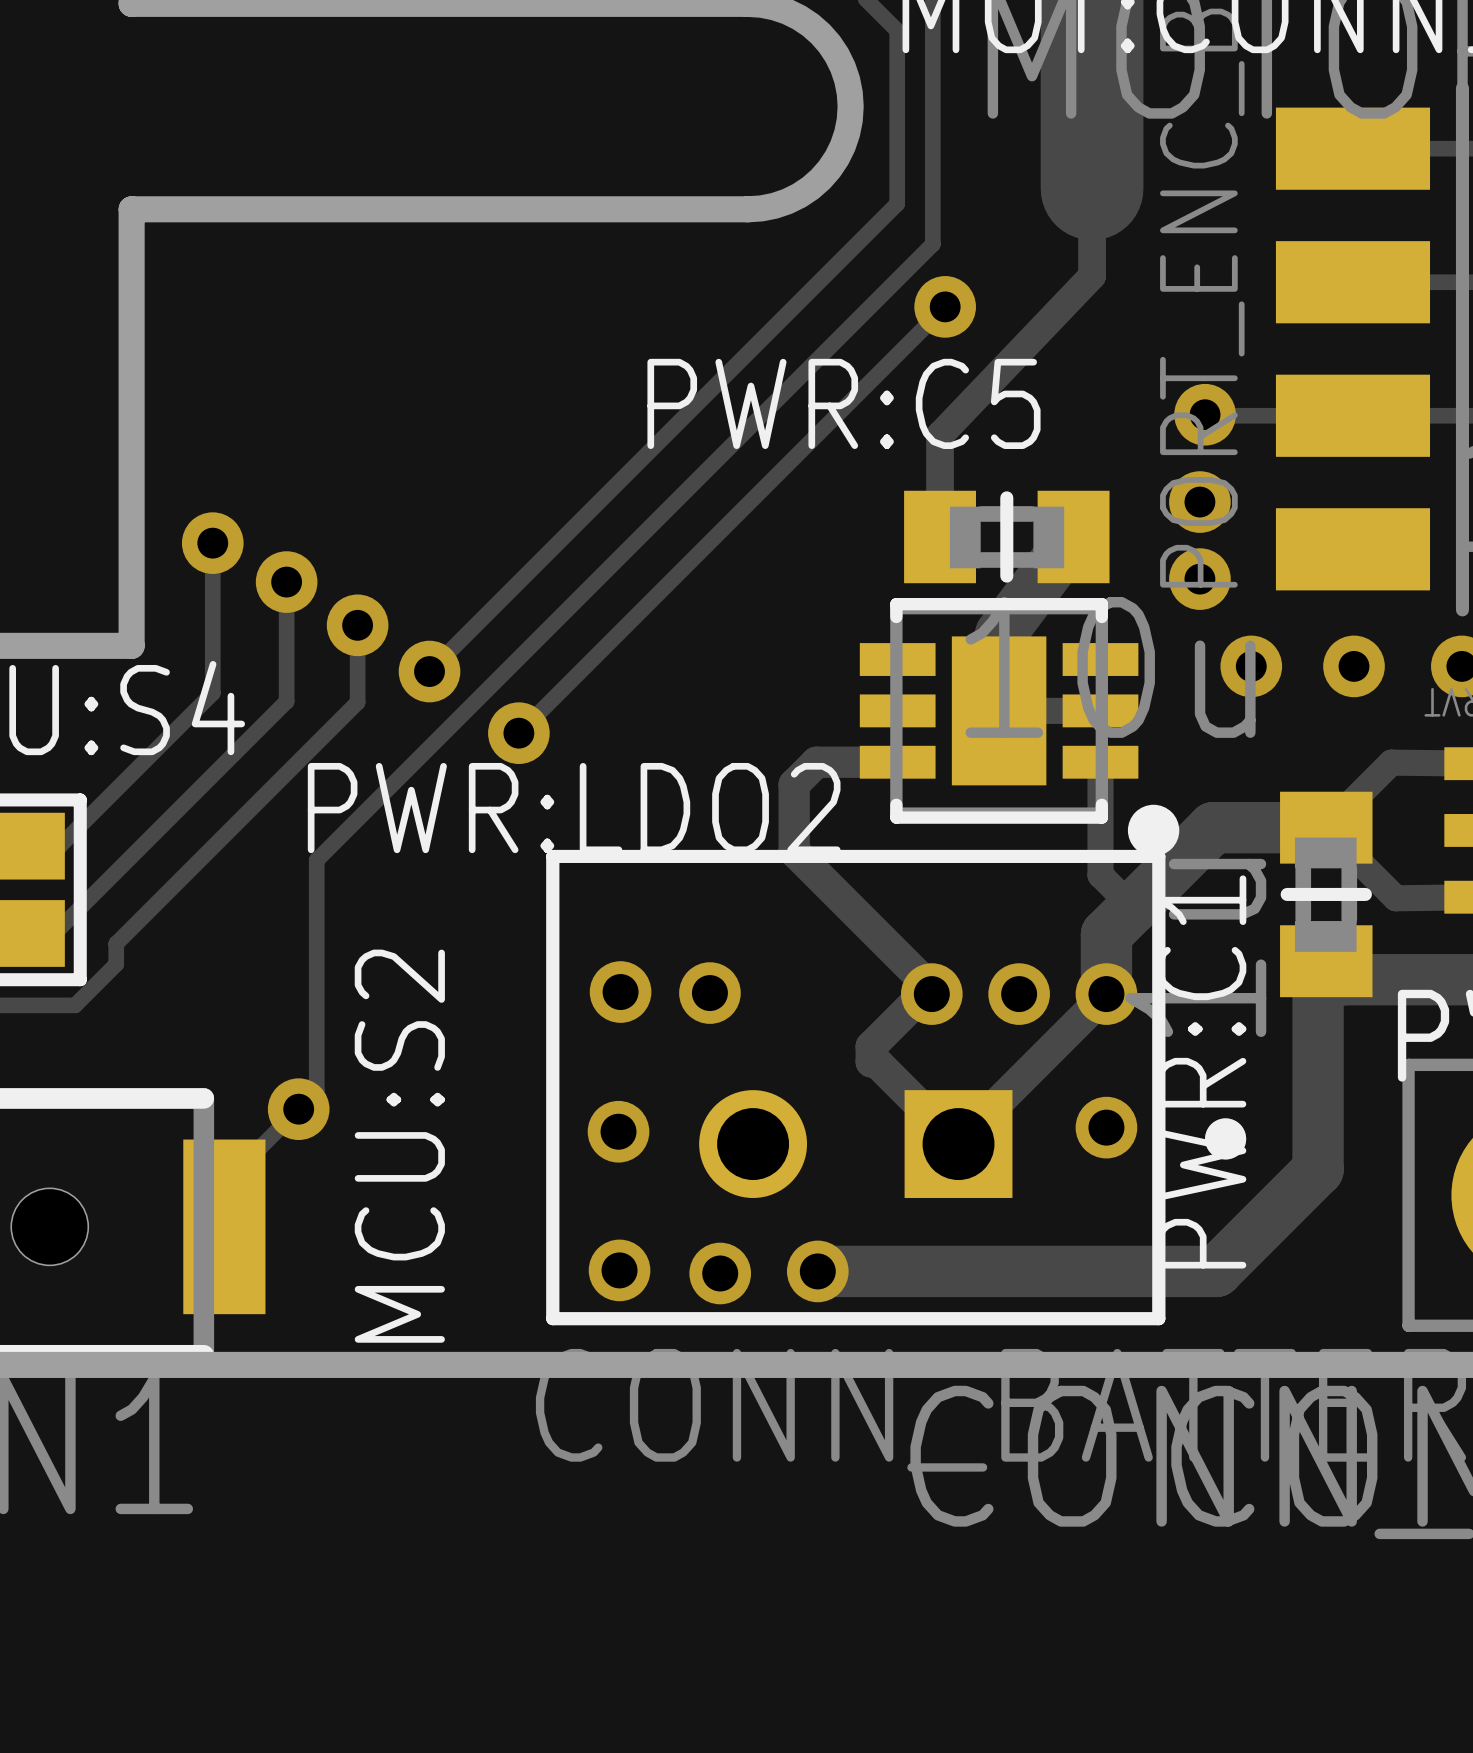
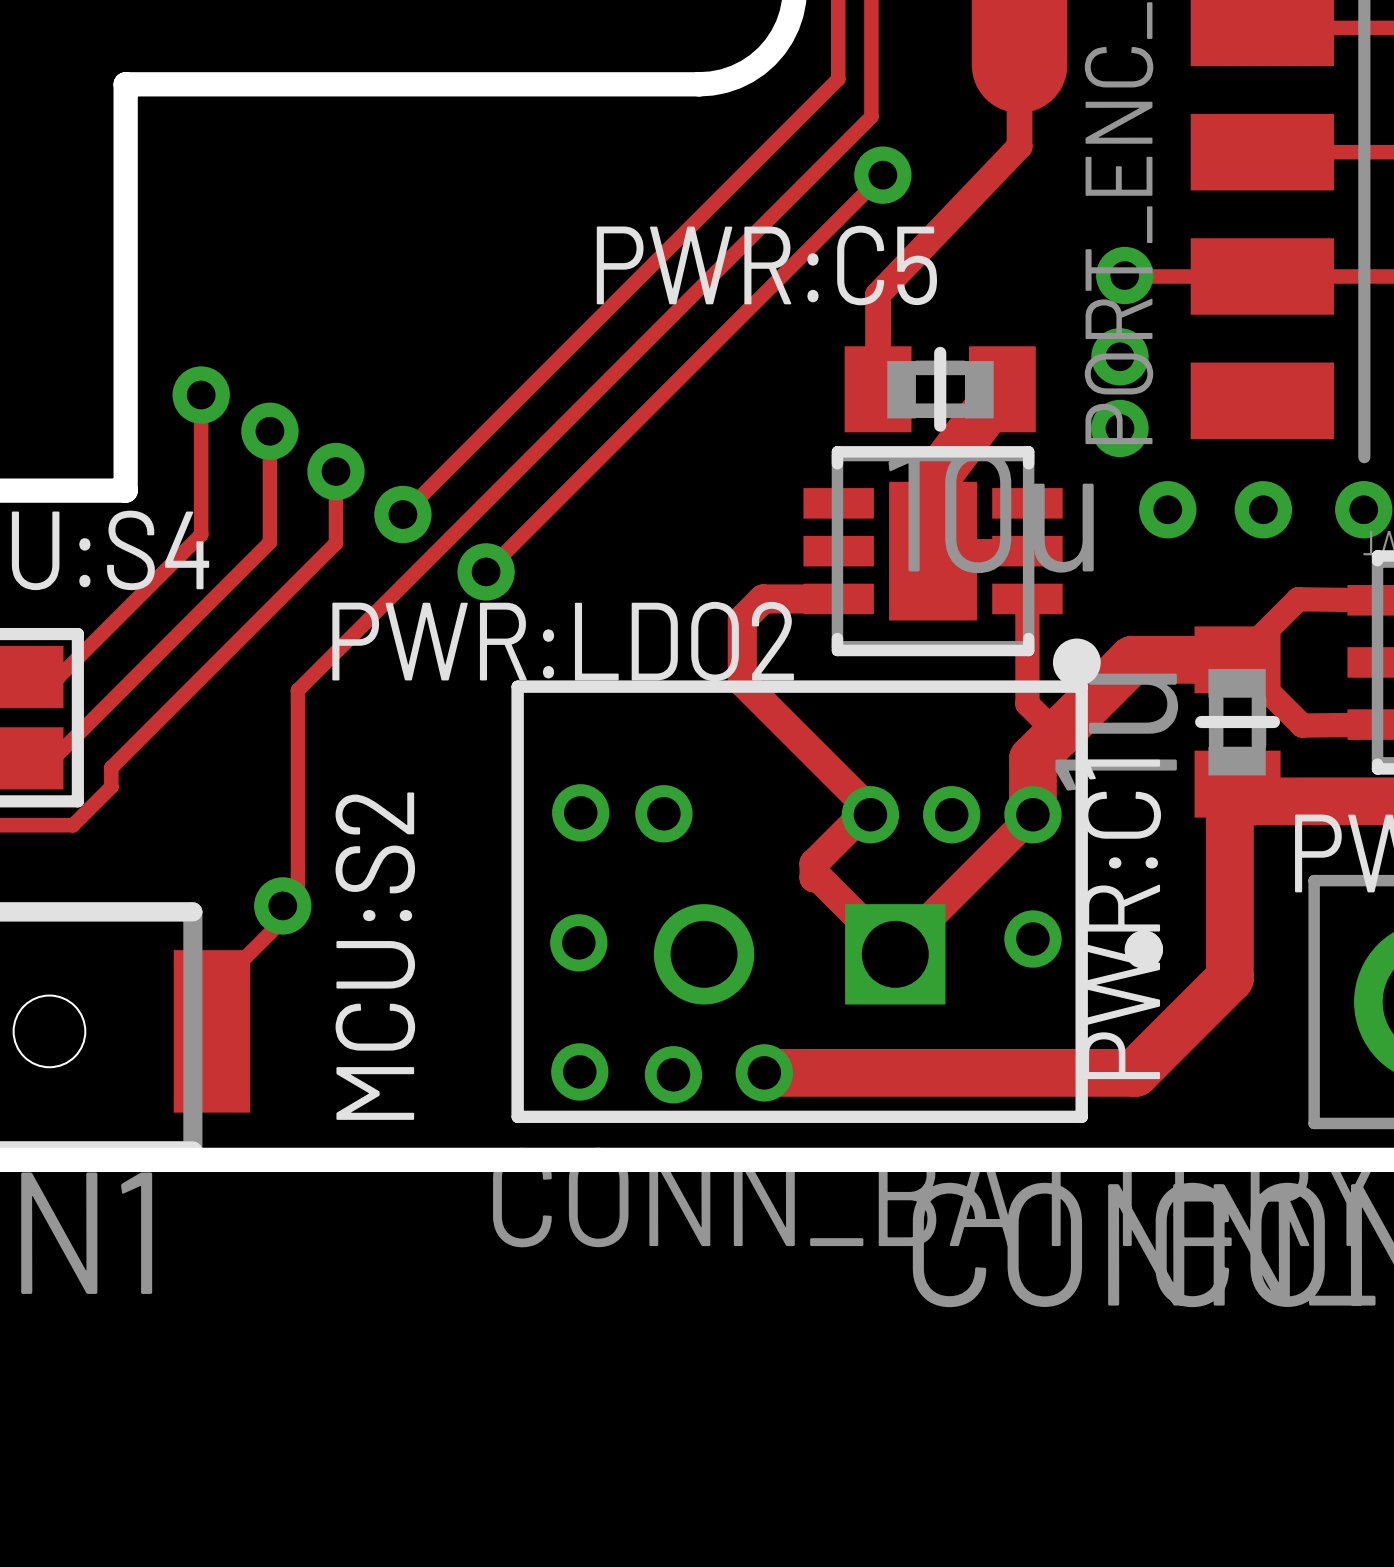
via position: (298, 1109) -> (282, 905)

